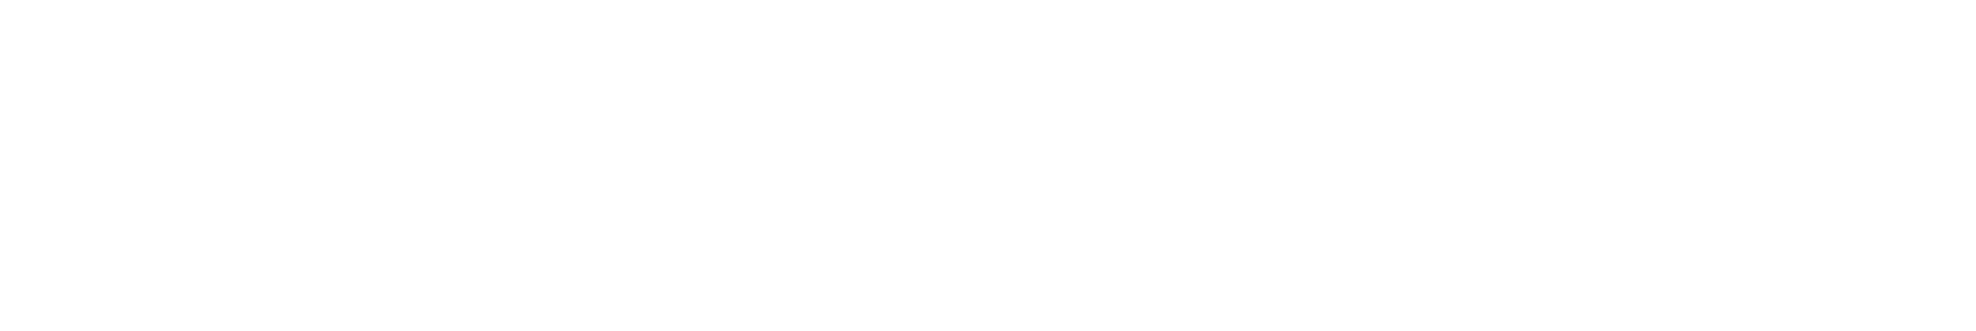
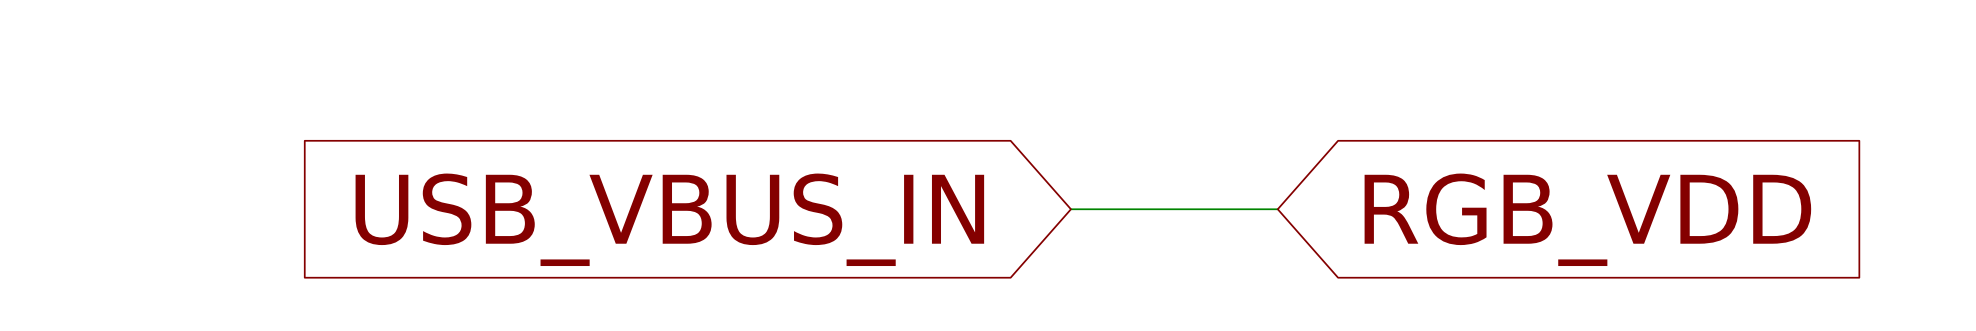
wire: none -> (1070, 209) (1277, 209)
global label: none -> USB_VBUS_IN (669, 219)
global label: none -> RGB_VDD (1587, 219)

